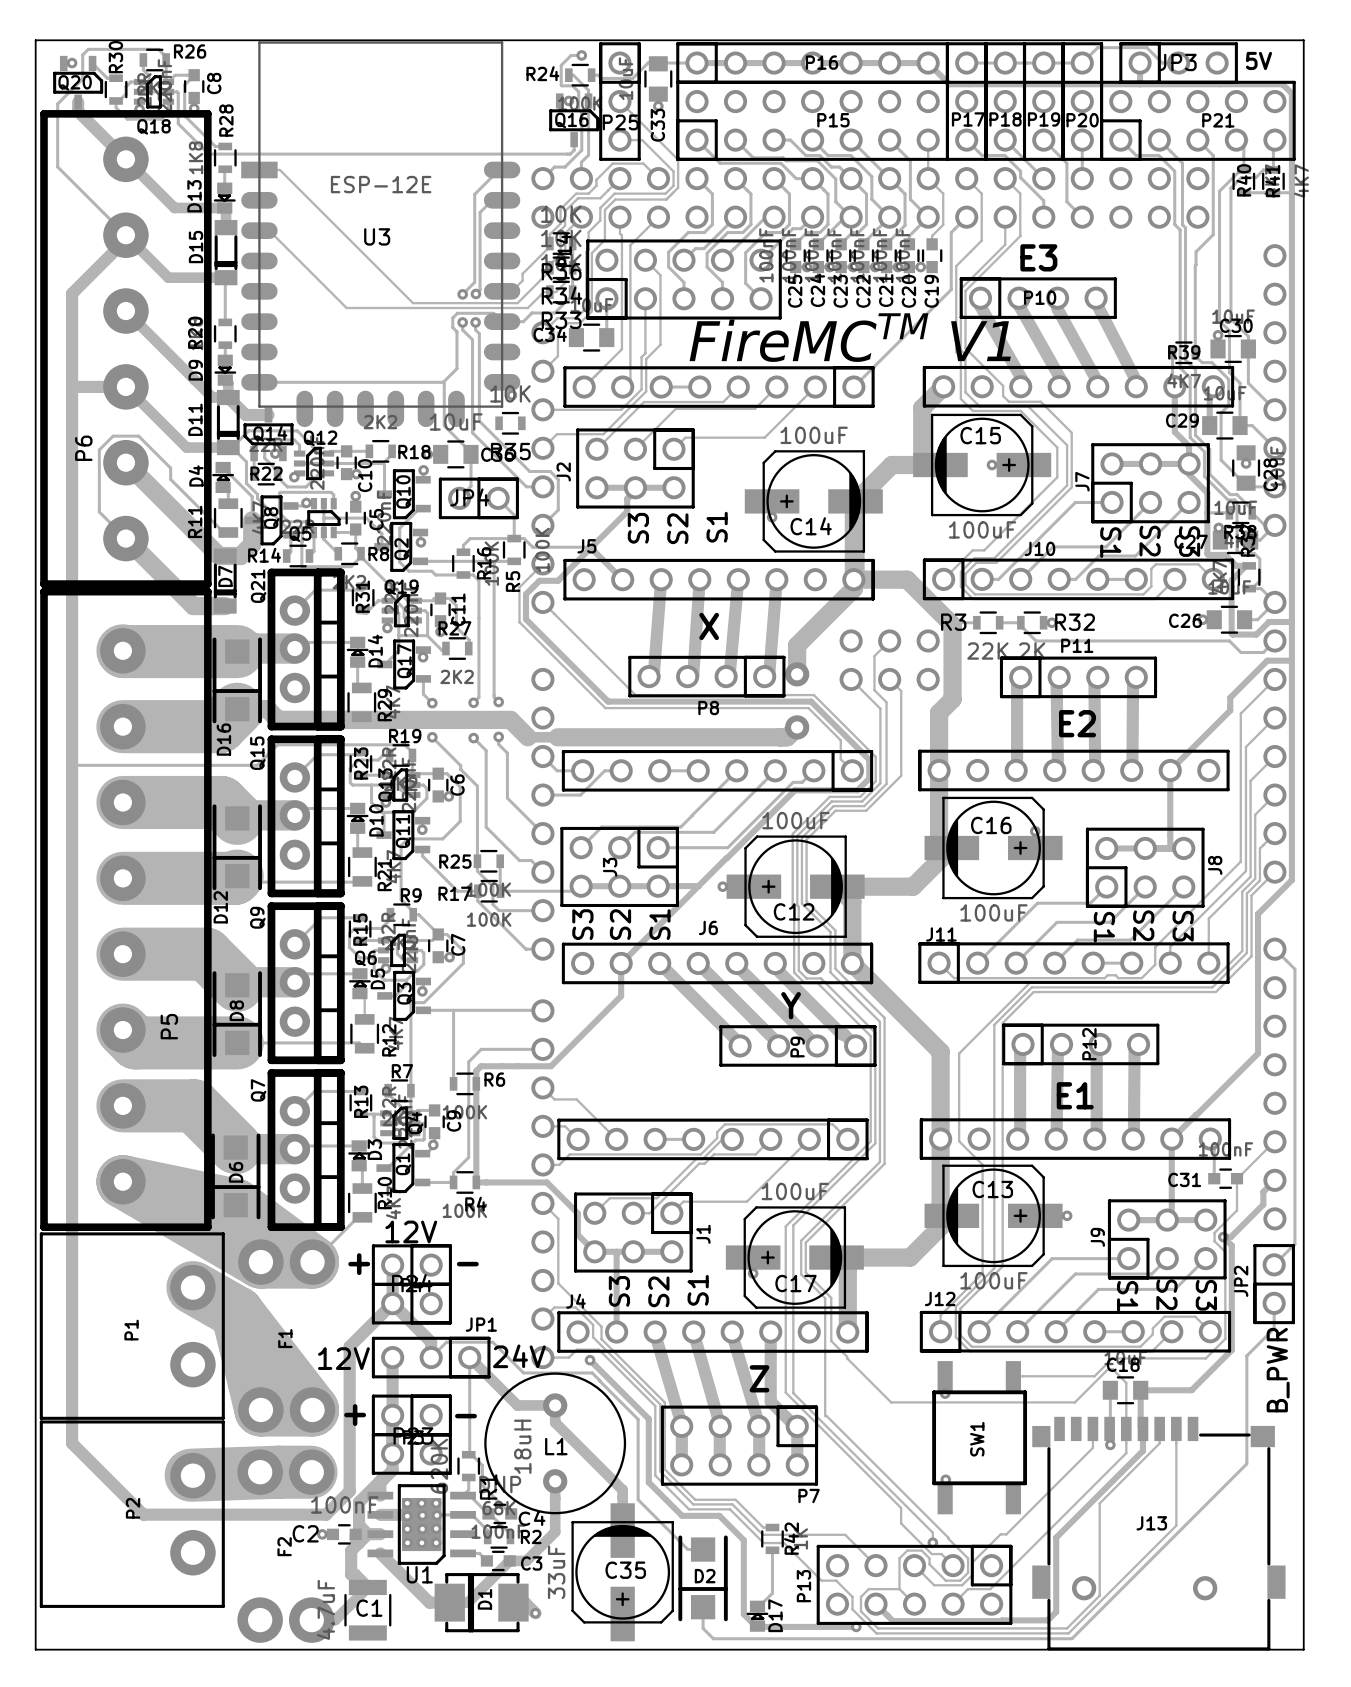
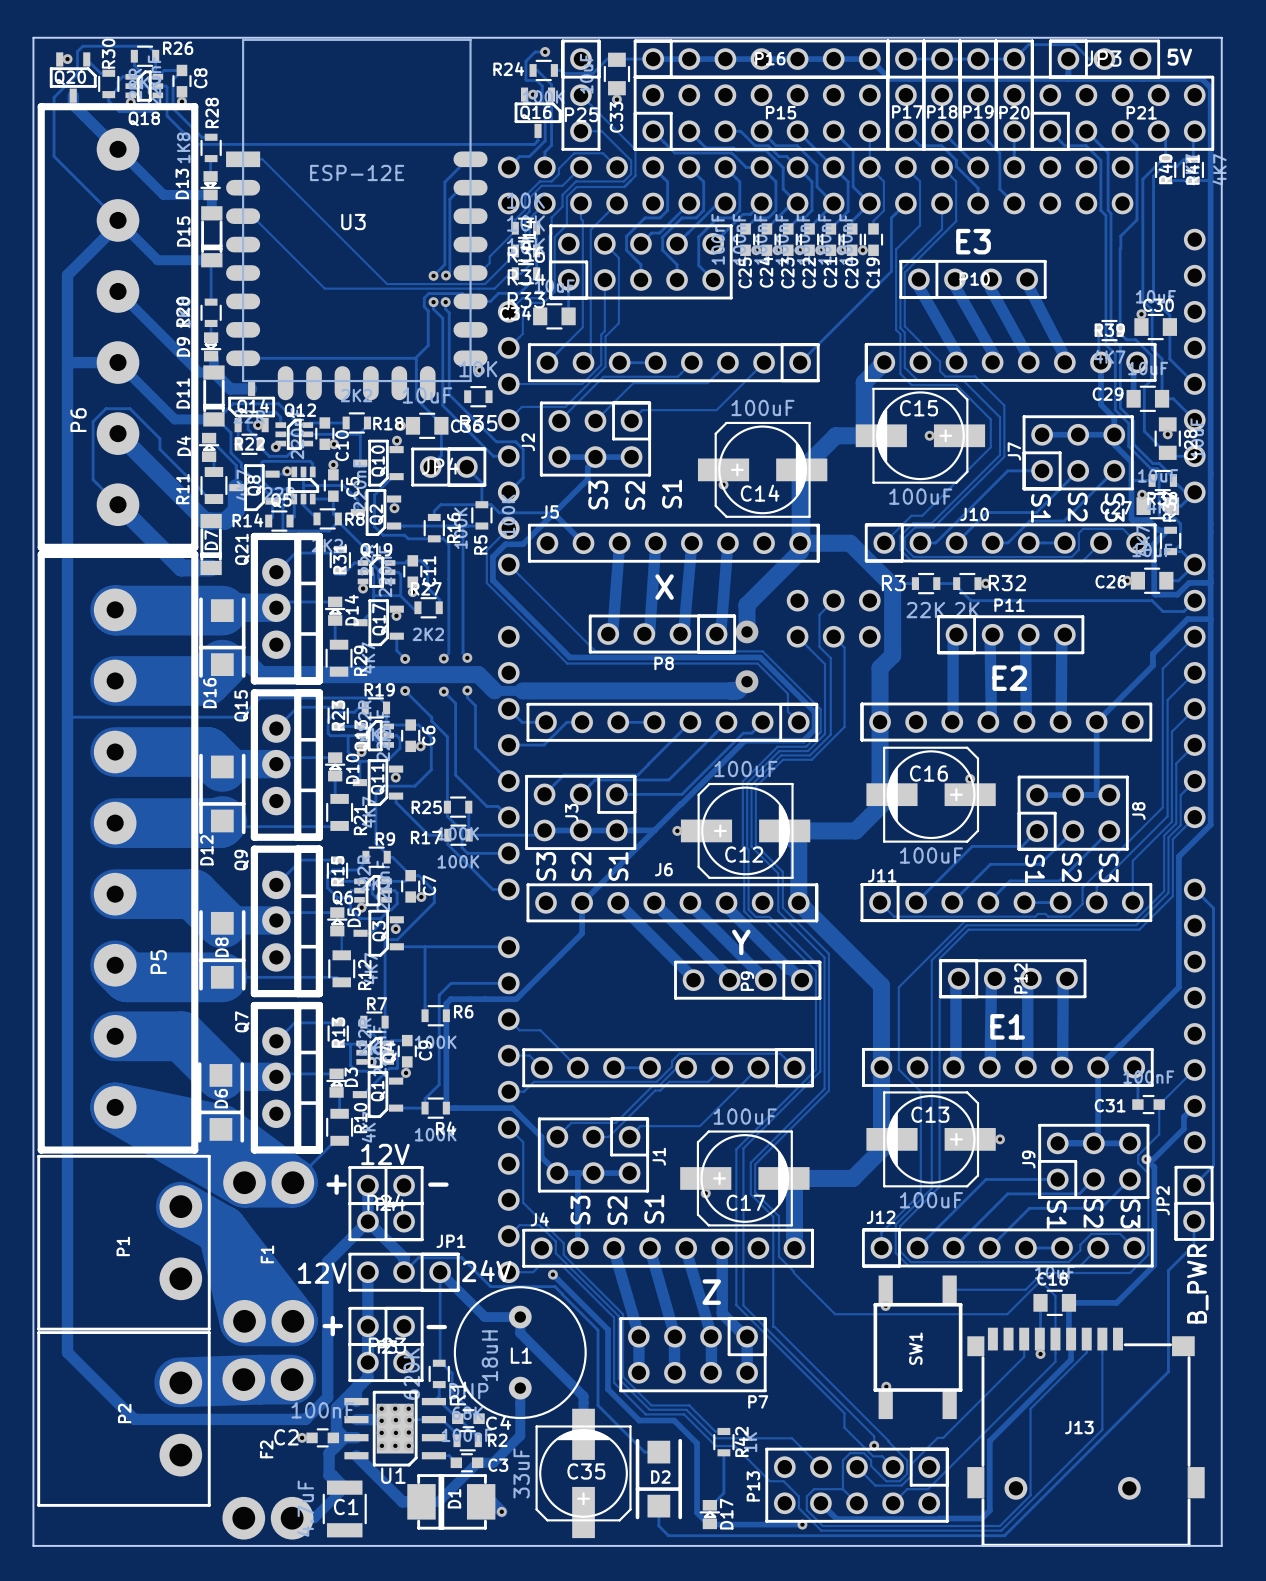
drawing: [689, 313, 1011, 362] -> none

